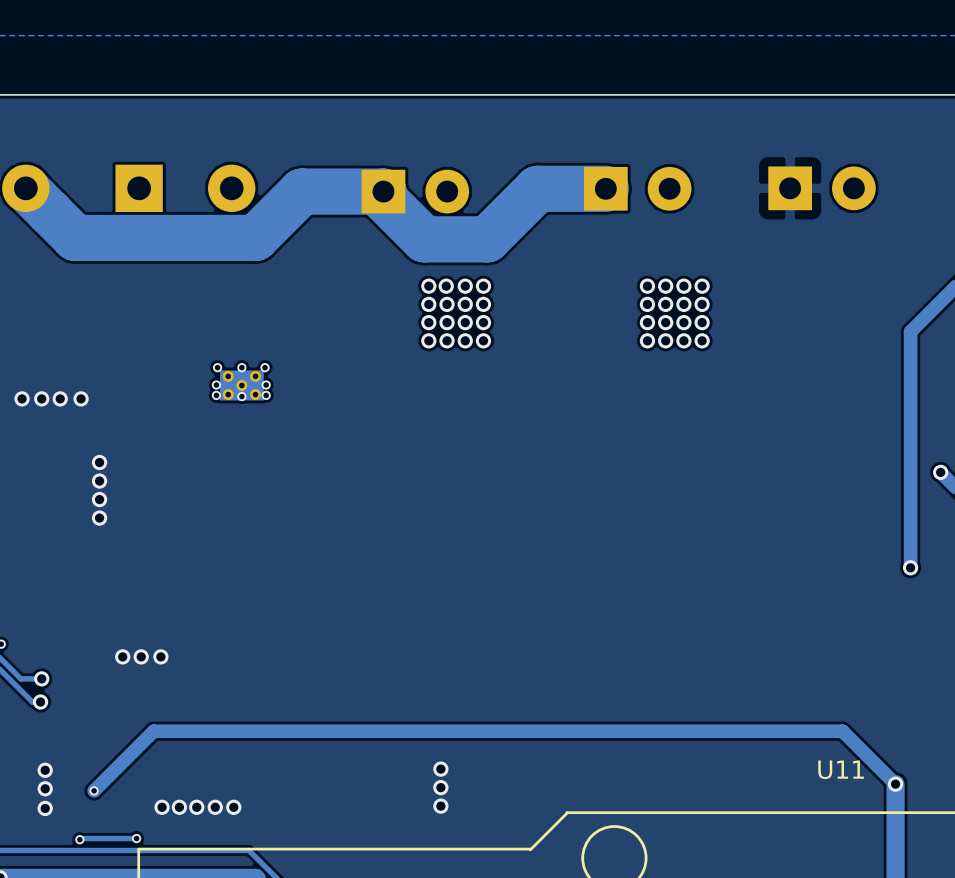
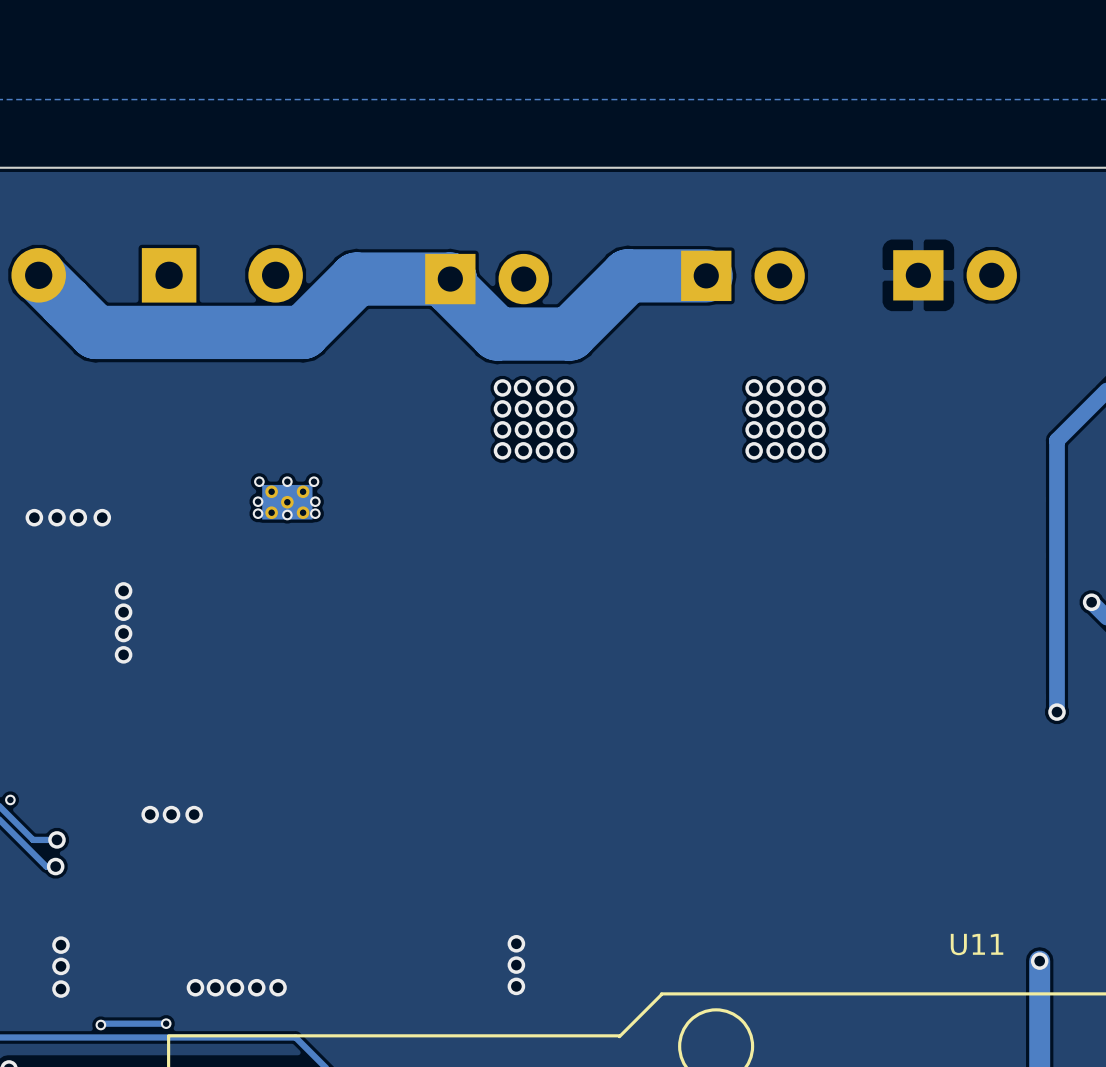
track: (895, 784) (842, 731) (153, 731) (94, 790) -> none
via: (94, 790) -> none

